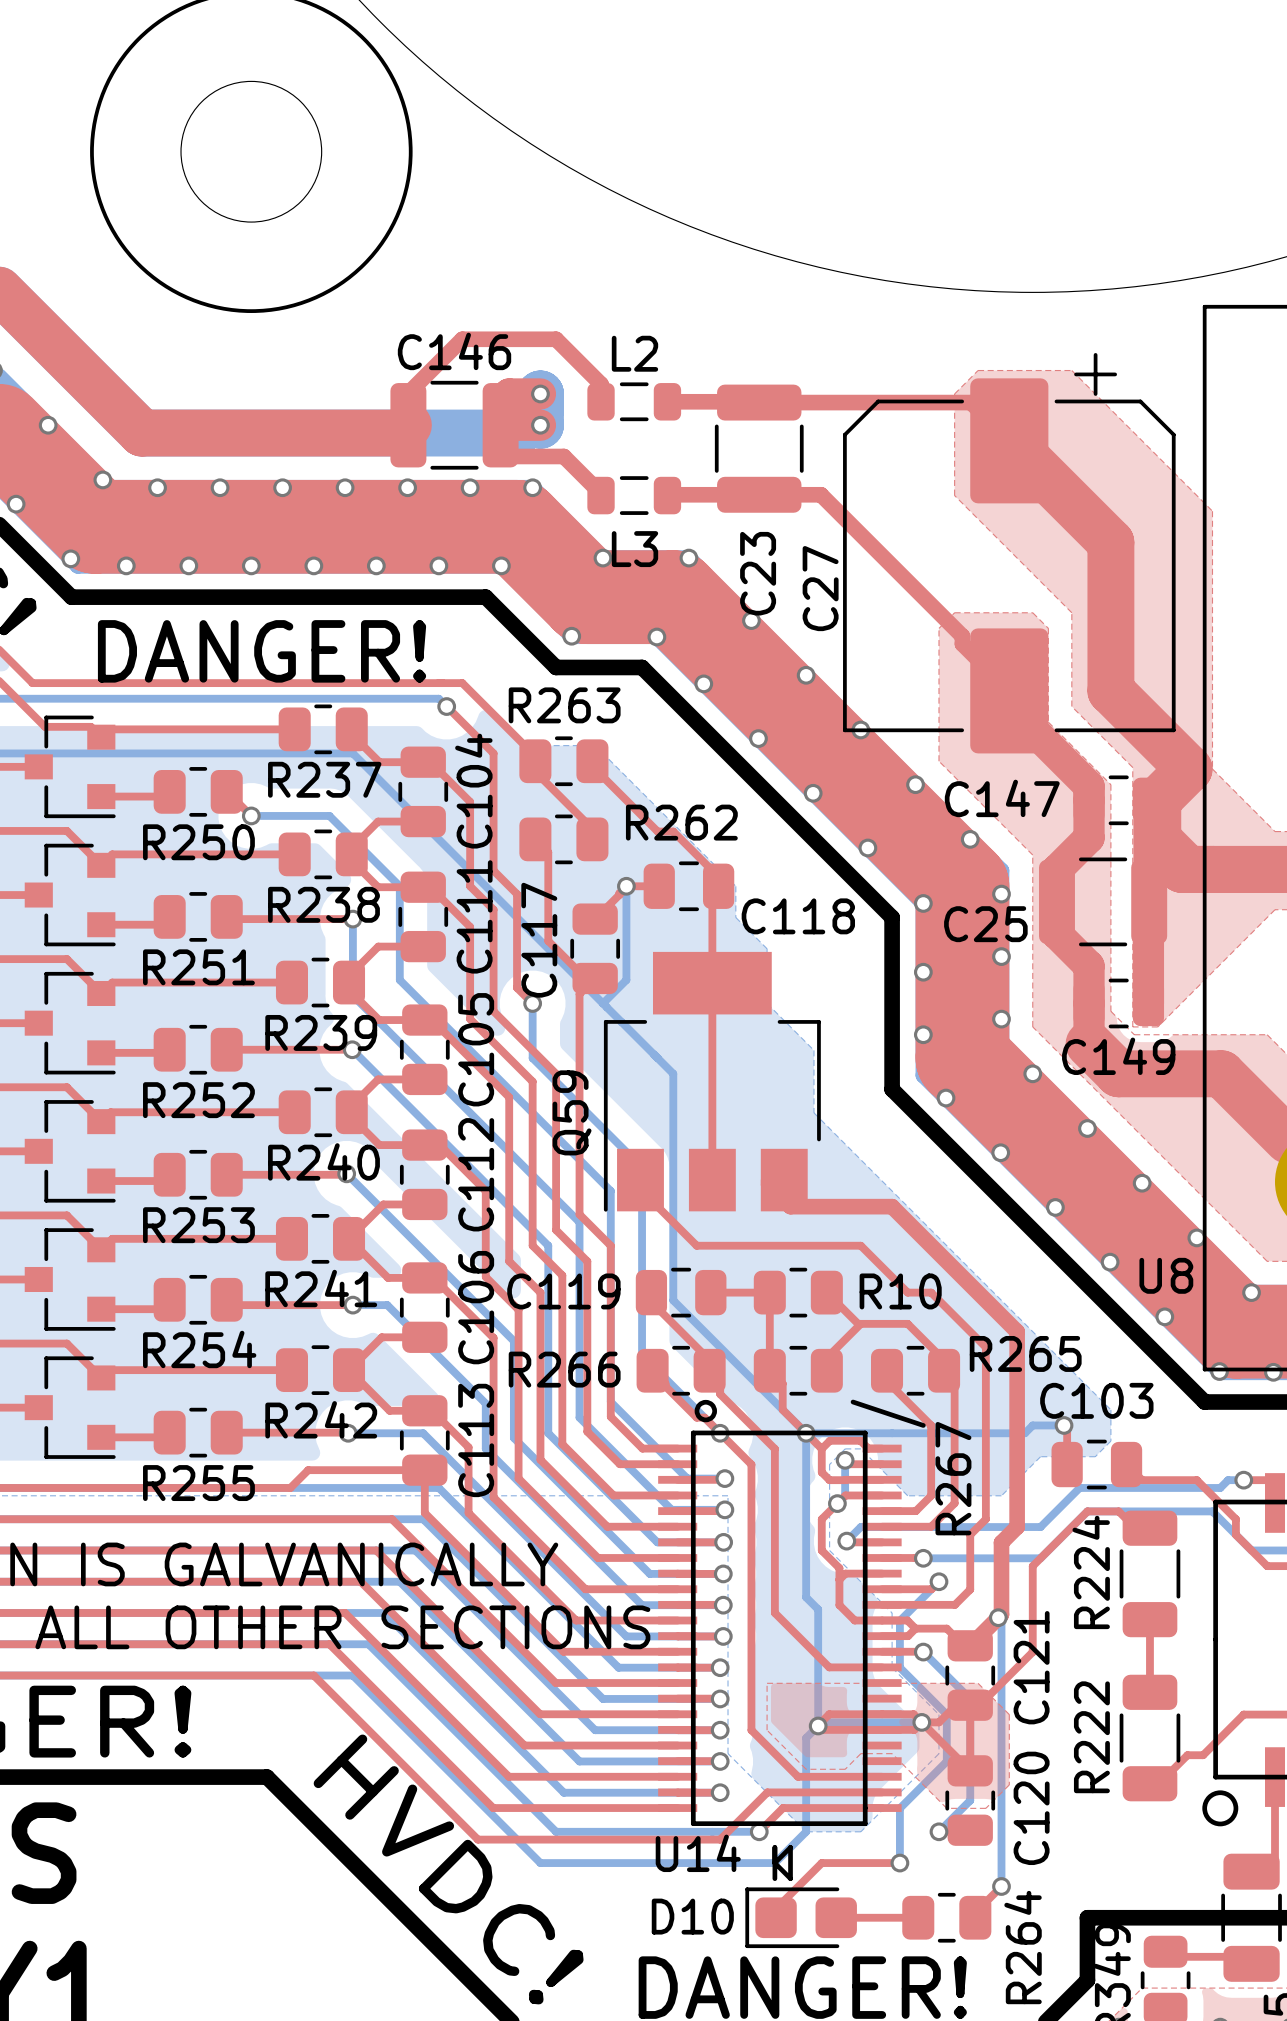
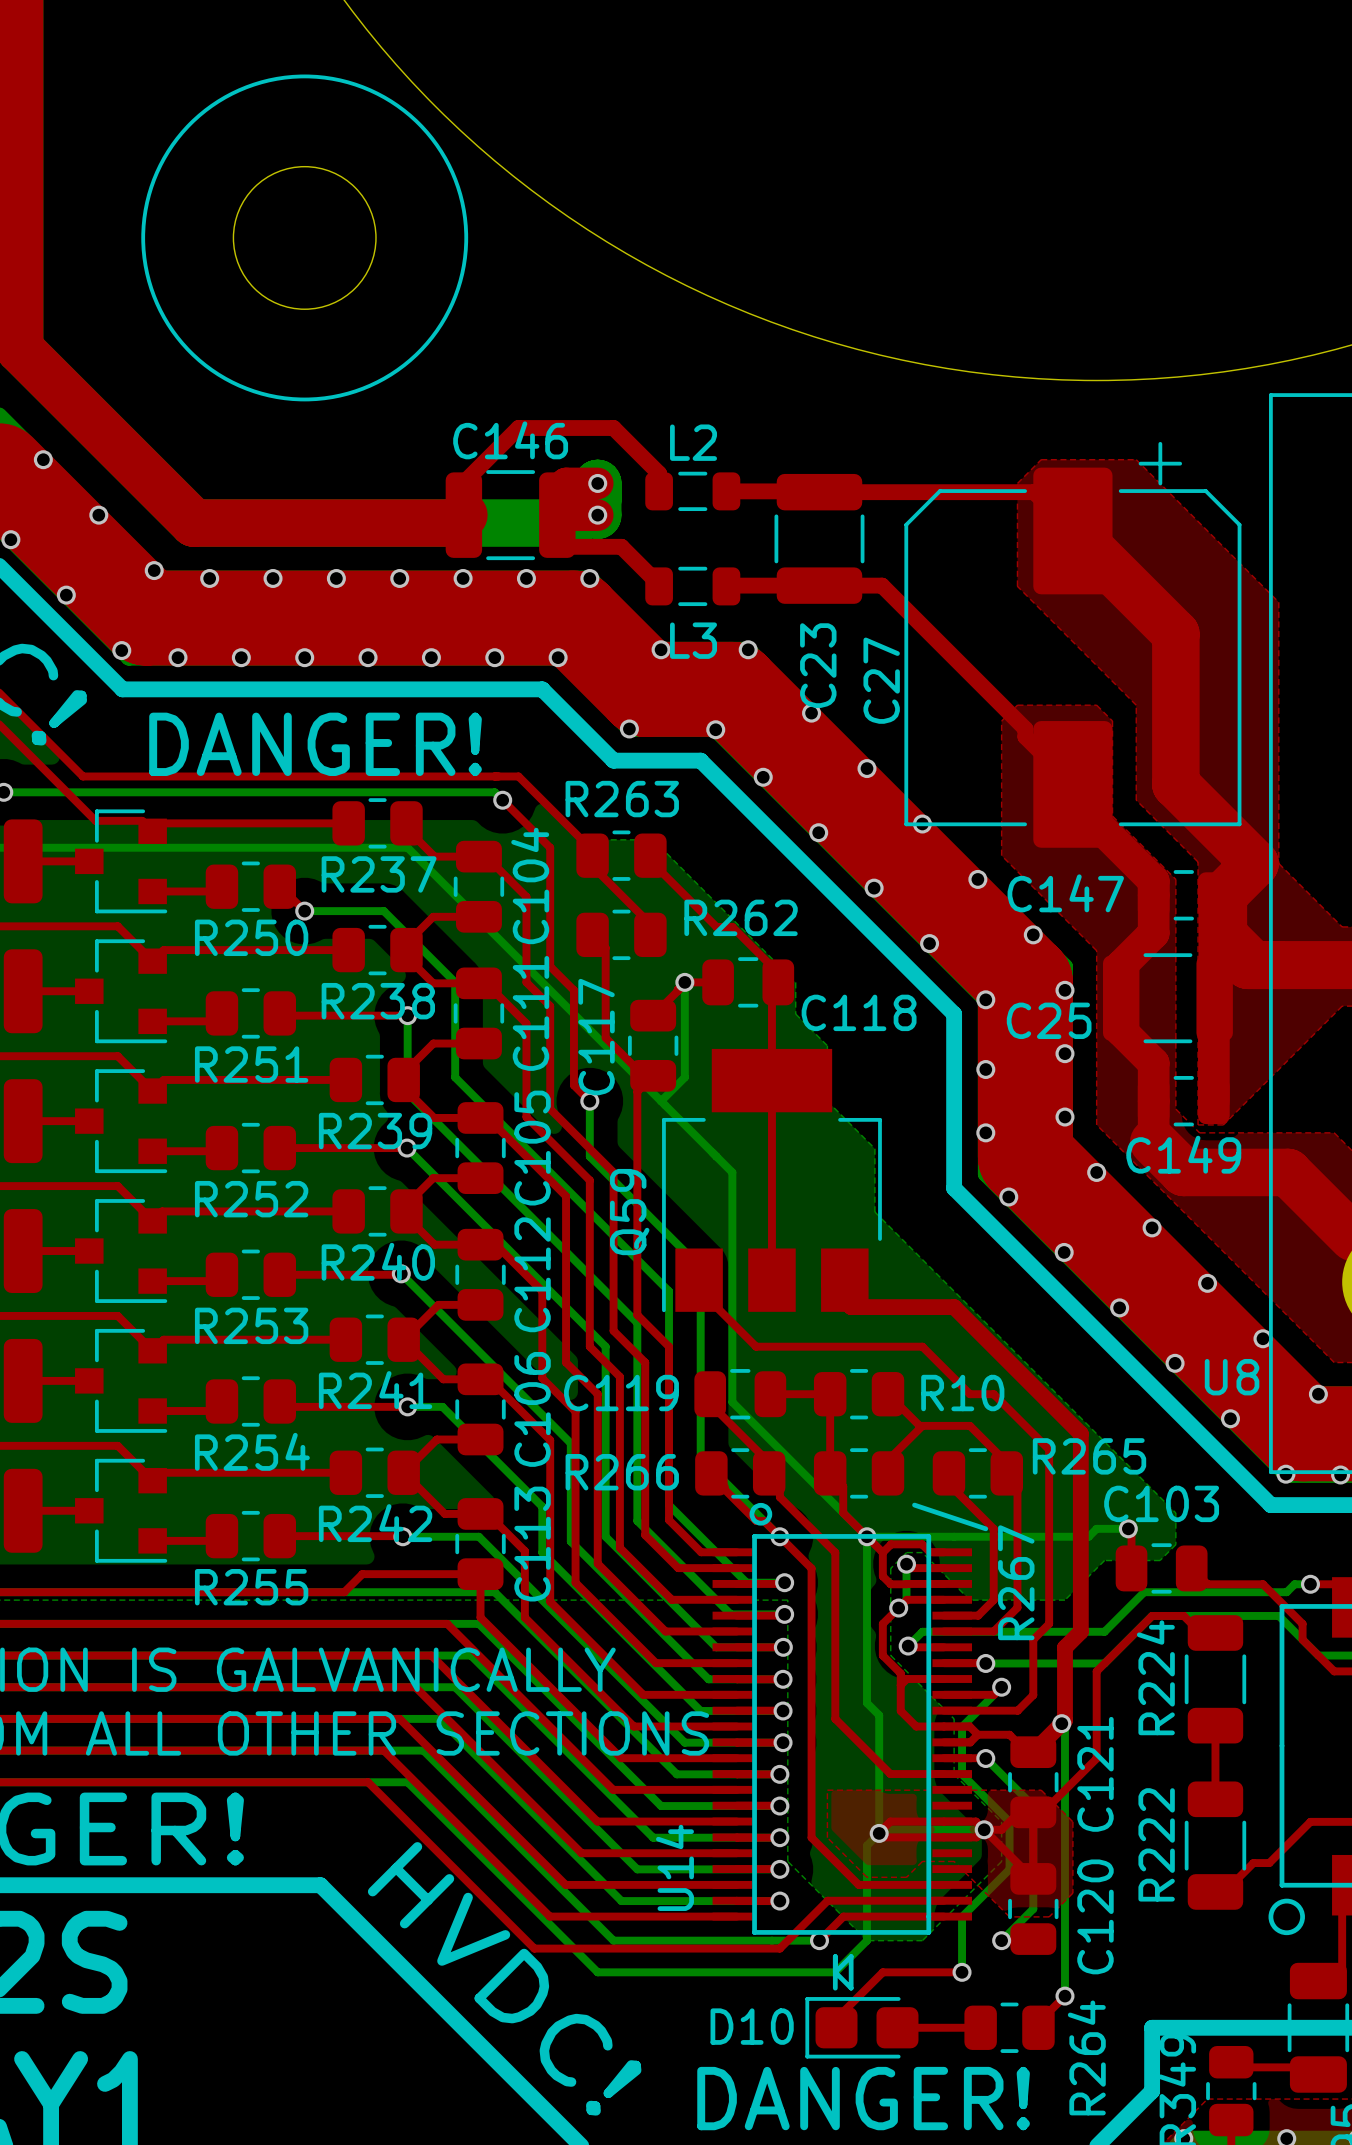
U14 footprint: [658, 1399, 902, 1827] -> [712, 1502, 973, 1935]
U14 name rotation: 0° (698, 1853) -> 90° counterclockwise (674, 1867)
U14 name position: U14 (698, 1853) -> U14 (674, 1867)

